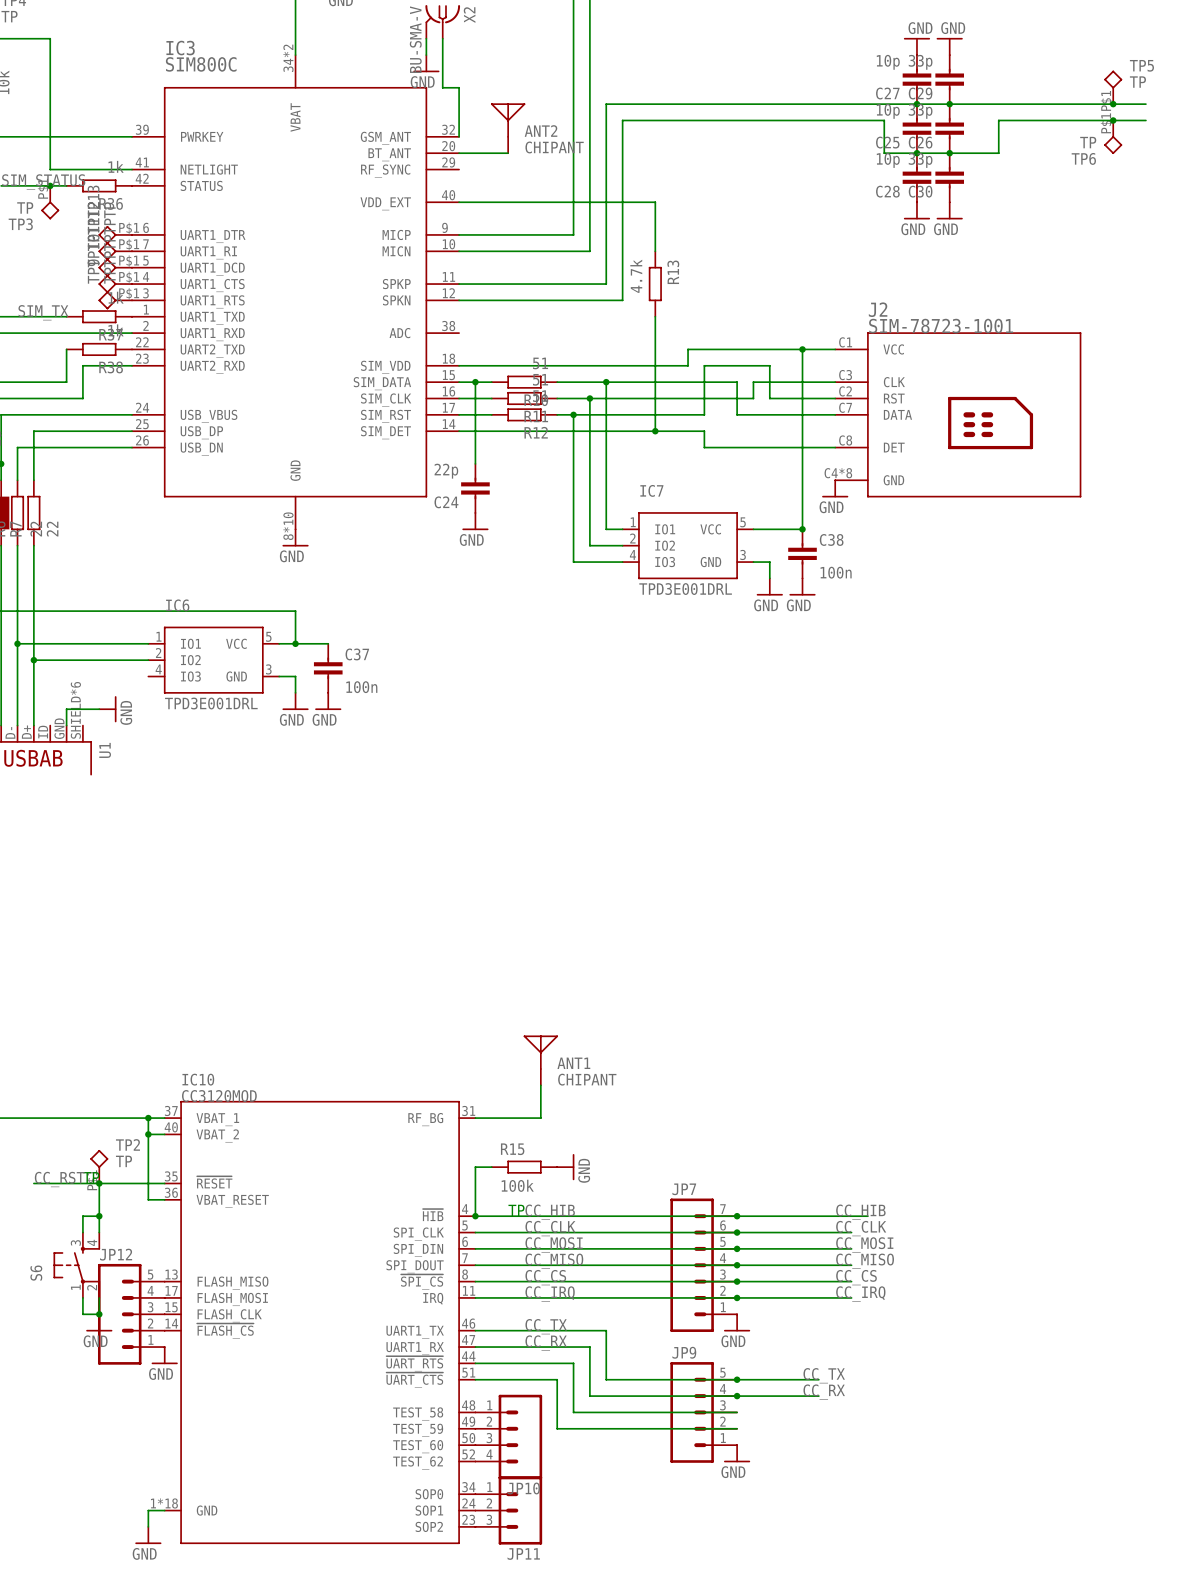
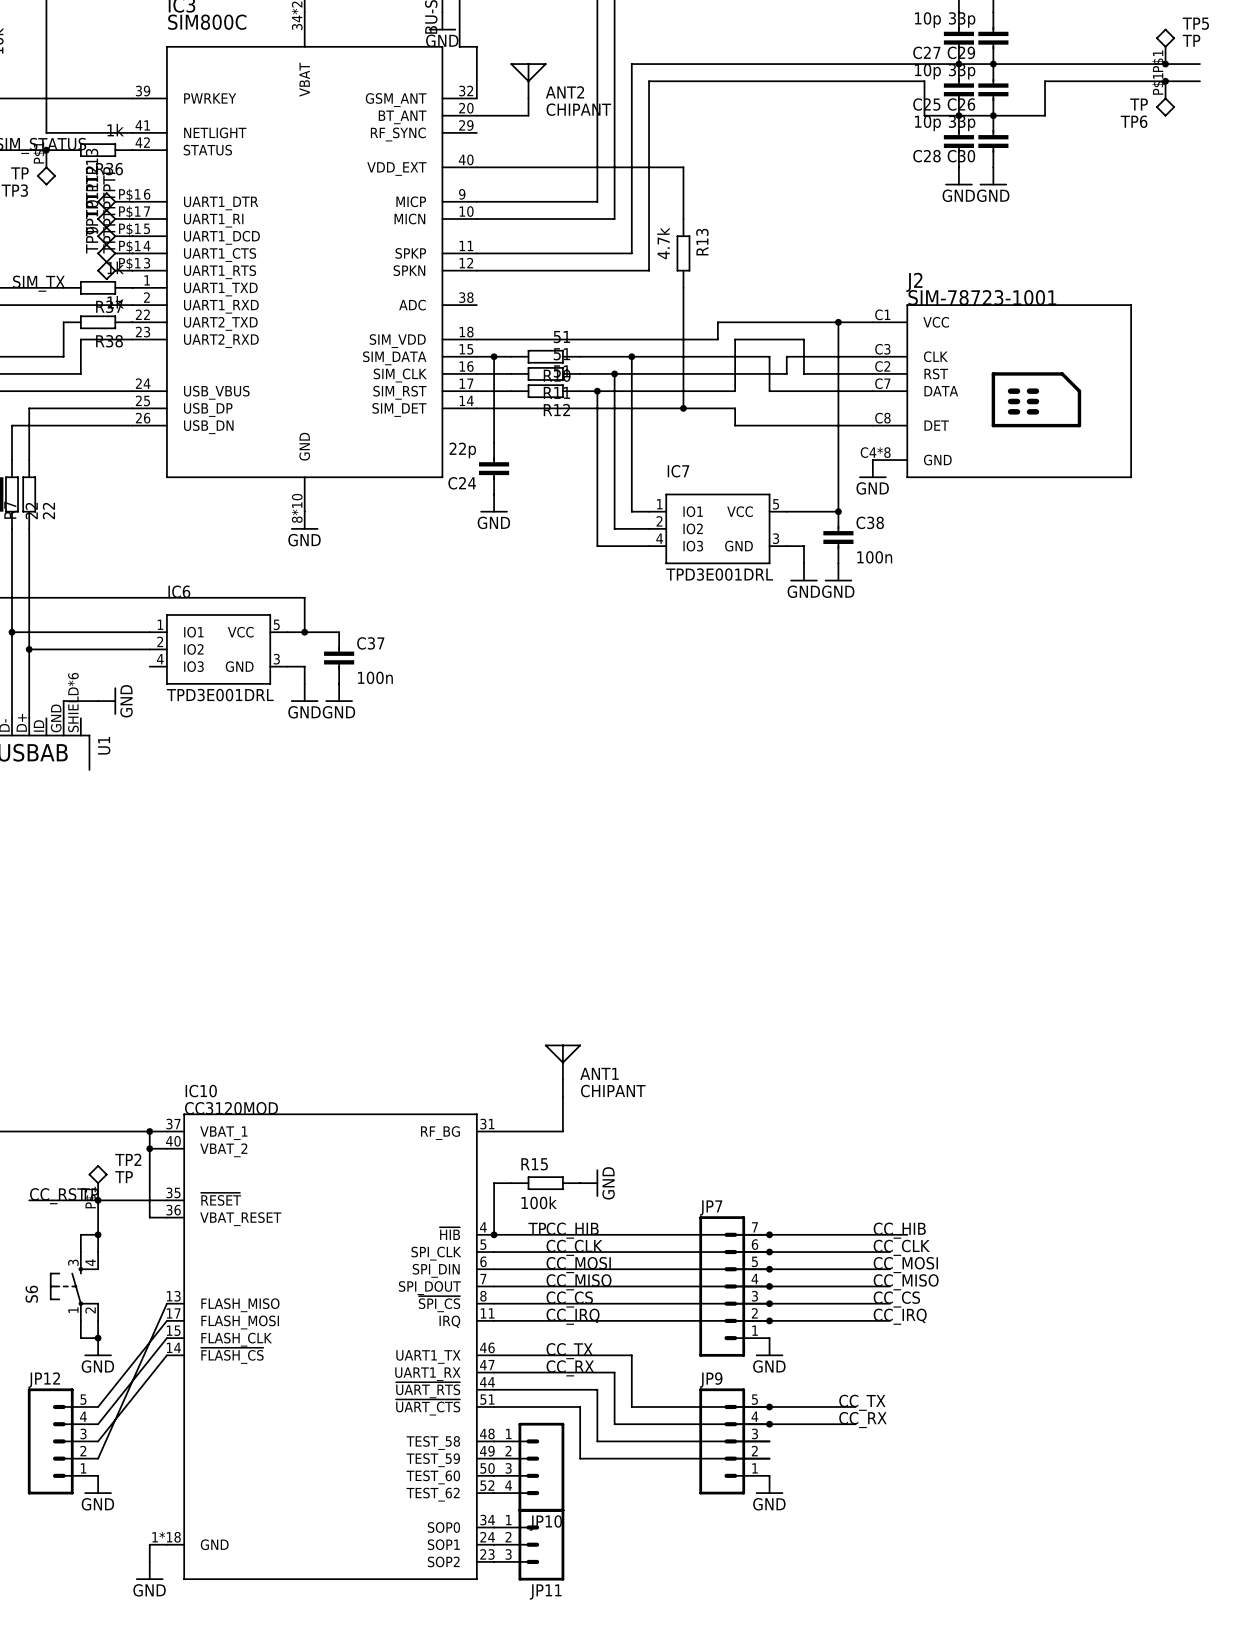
wire: none -> (166, 1303) (98, 1458)
wire: none -> (166, 1320) (98, 1406)
JP12 position: (131, 1314) -> (62, 1441)
wire: none -> (166, 1338) (98, 1424)
wire: none -> (166, 1355) (98, 1441)
power symbol position: GND (164, 1355) -> GND (98, 1484)

